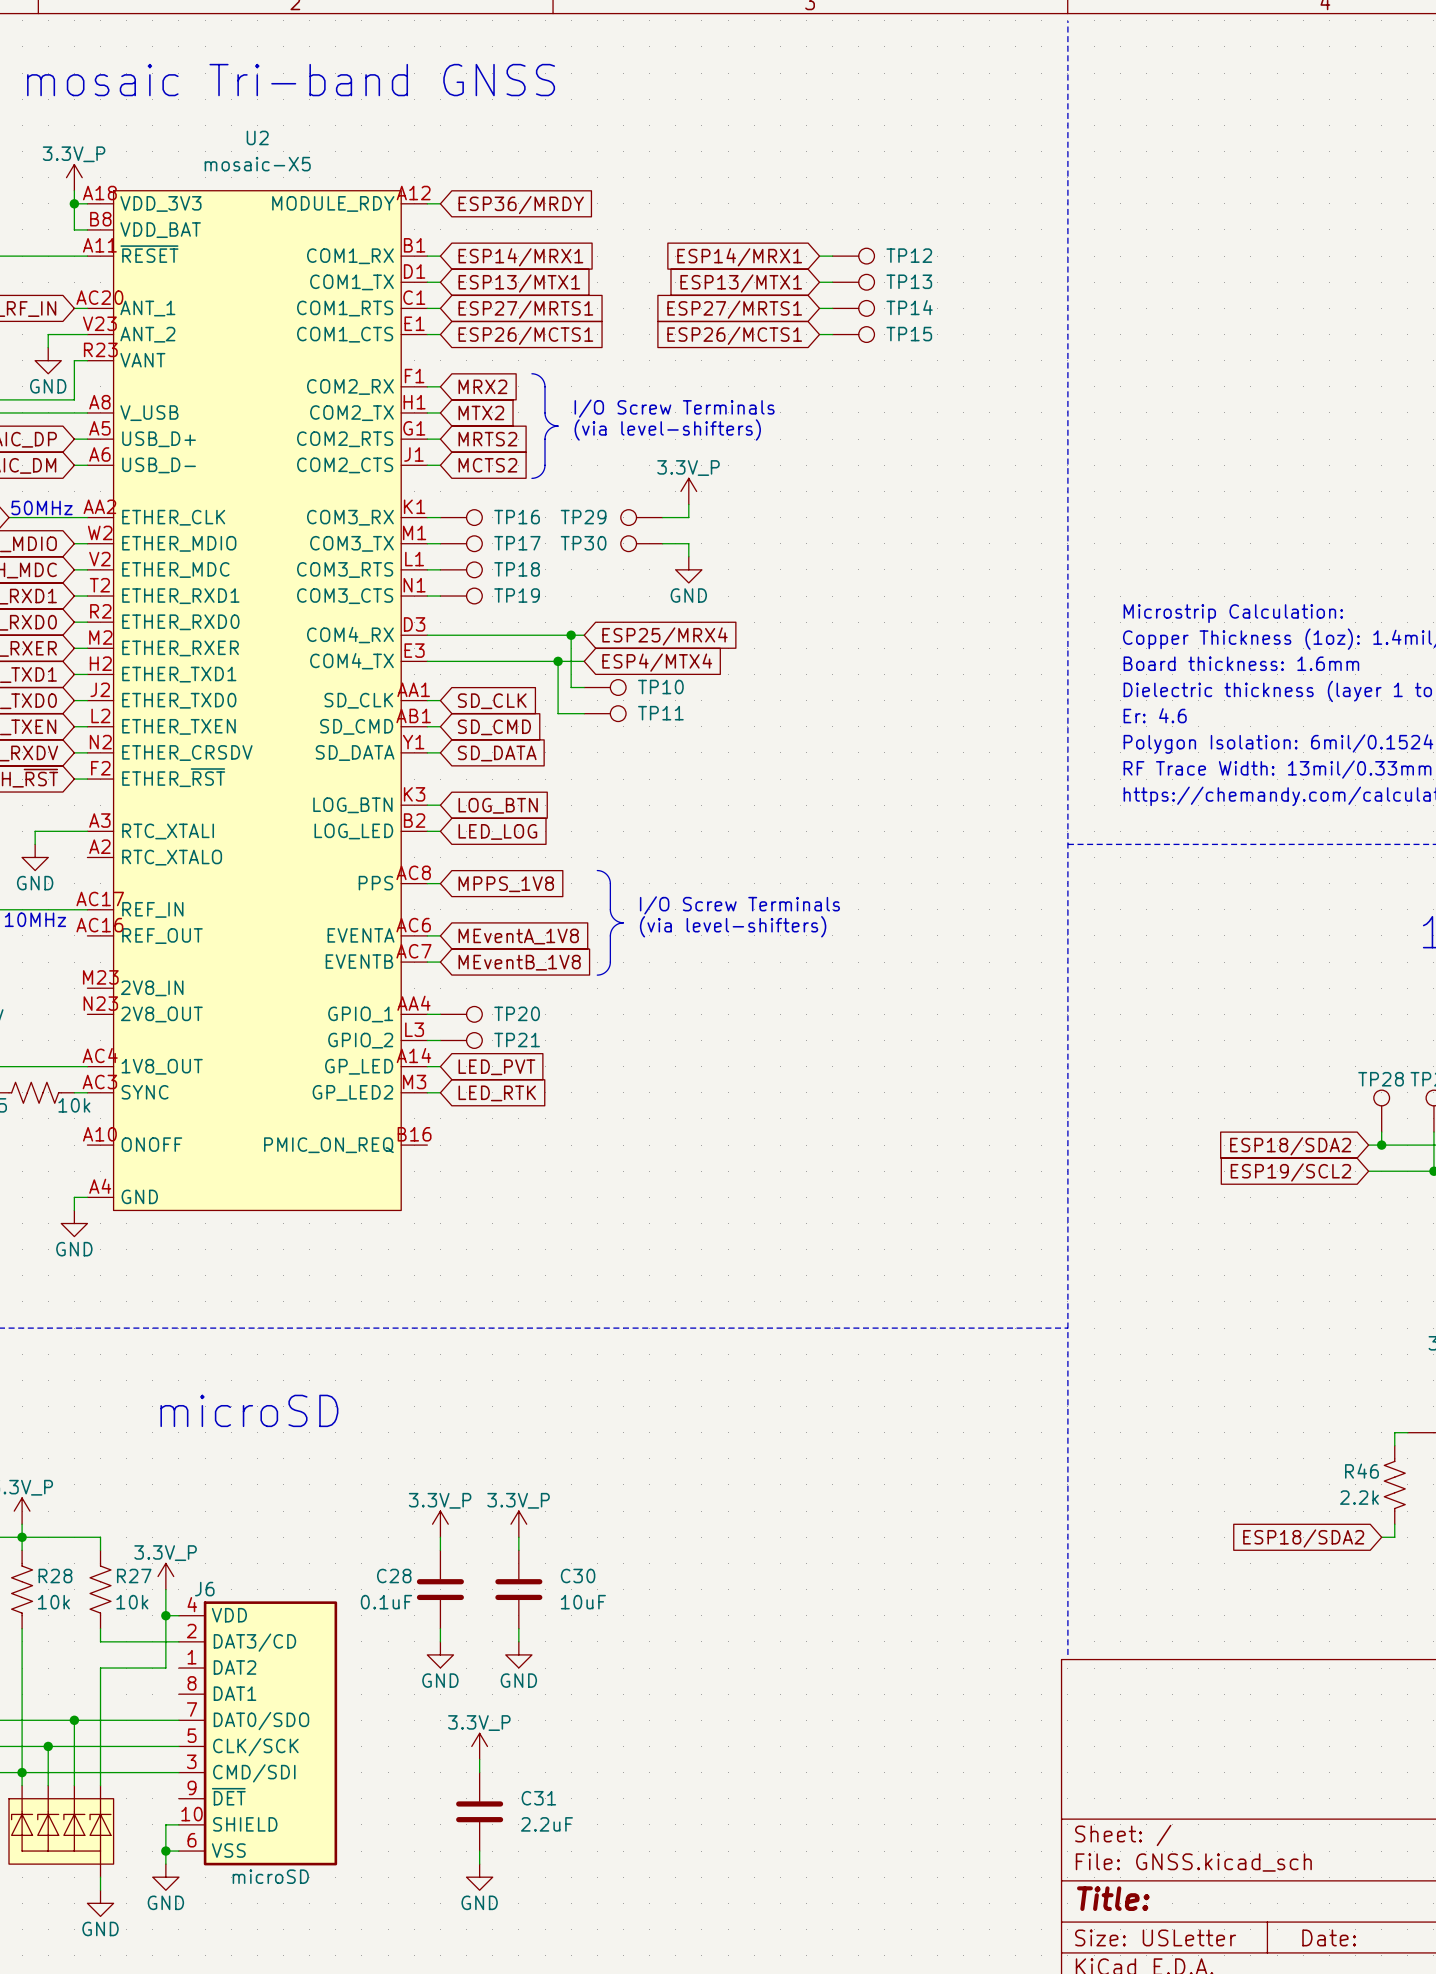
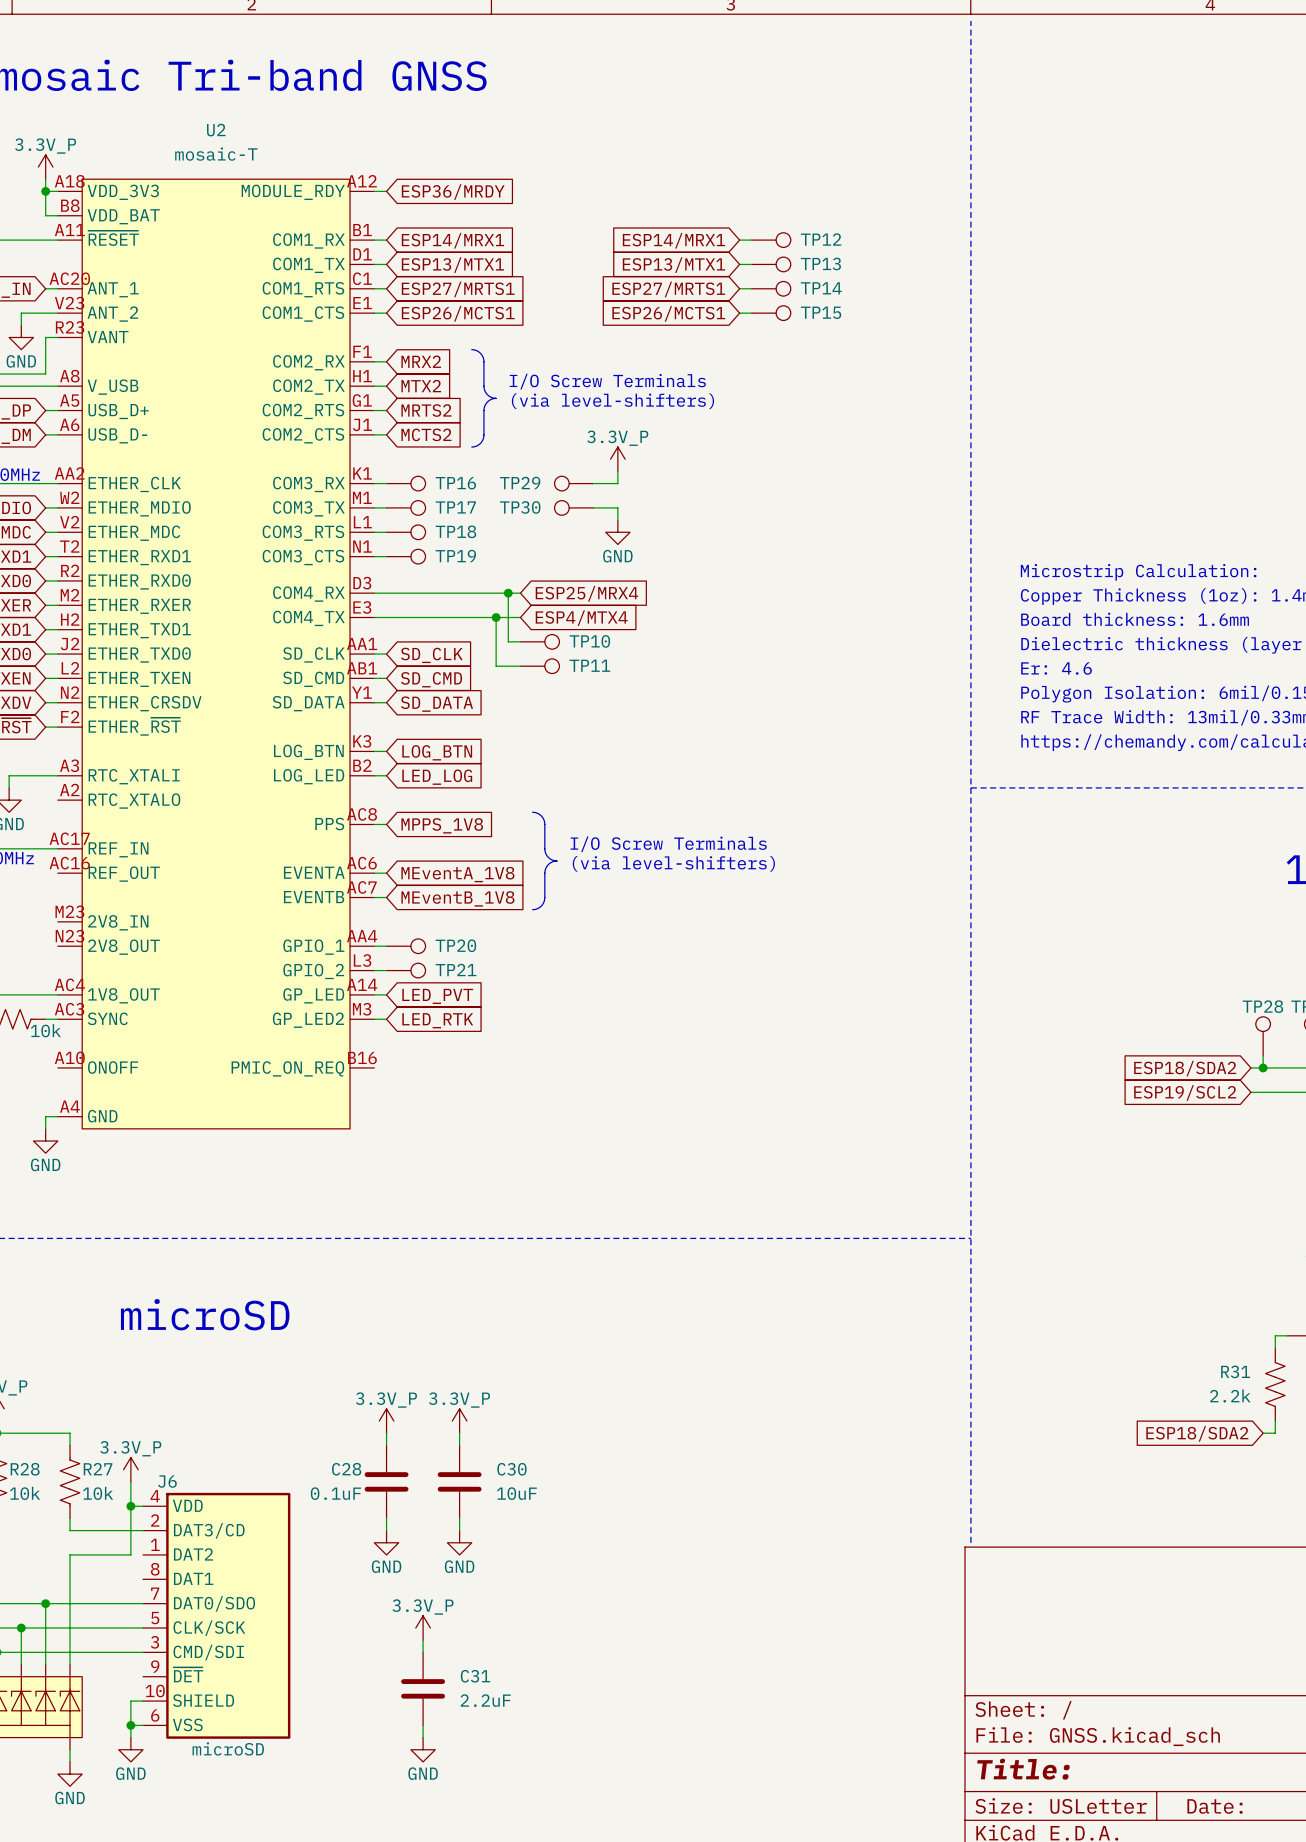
U2 value: mosaic-X5 (257, 164) -> mosaic-T (216, 154)
R46: 2.2k (1394, 1484) -> none
R31: none -> 2.2k (1275, 1384)

